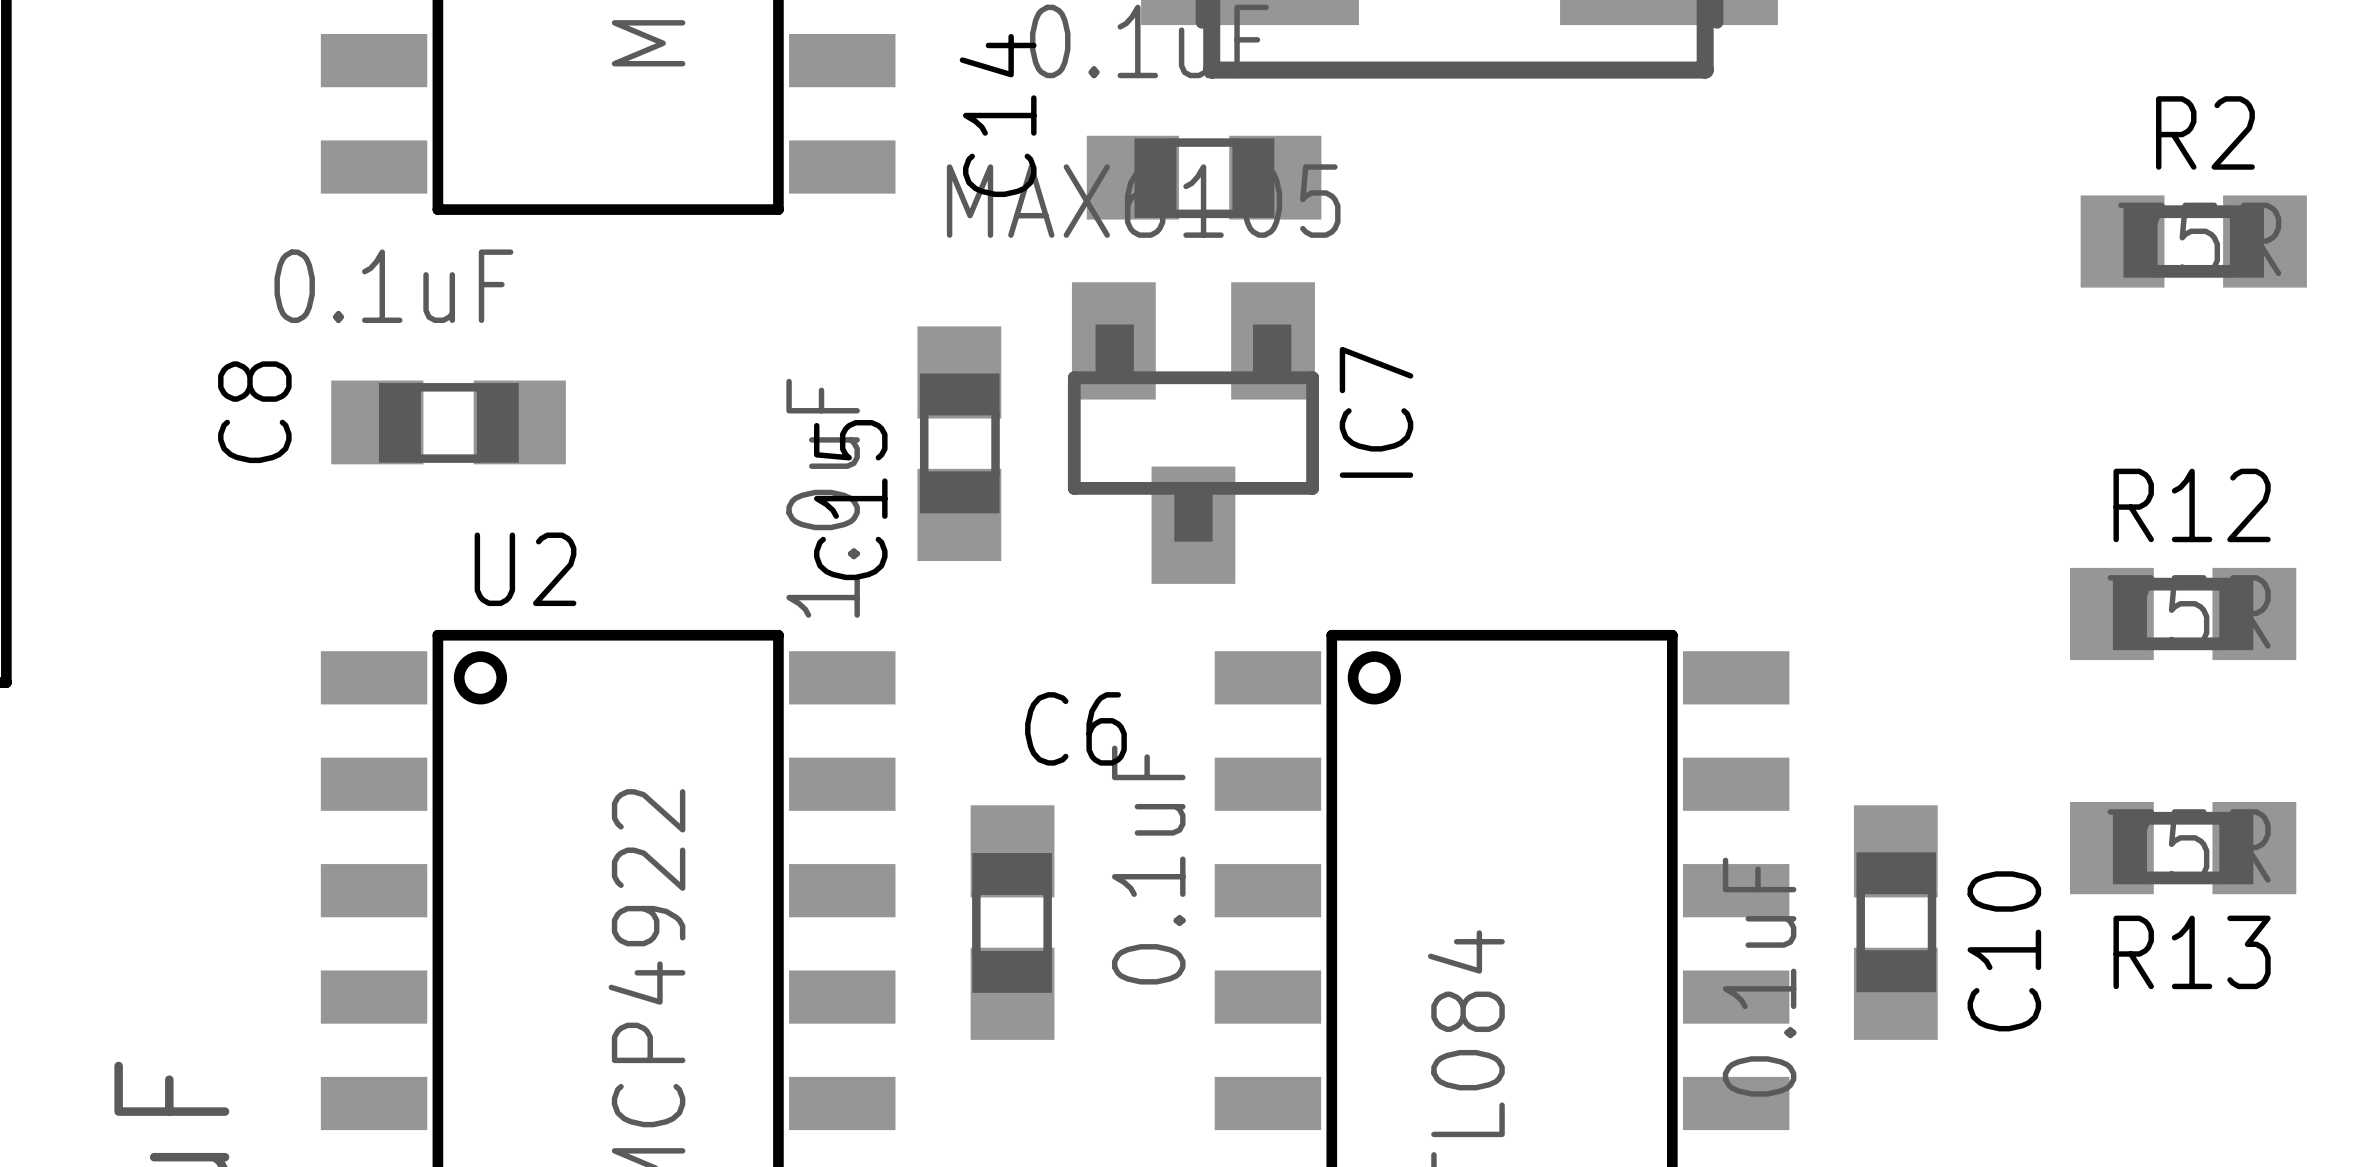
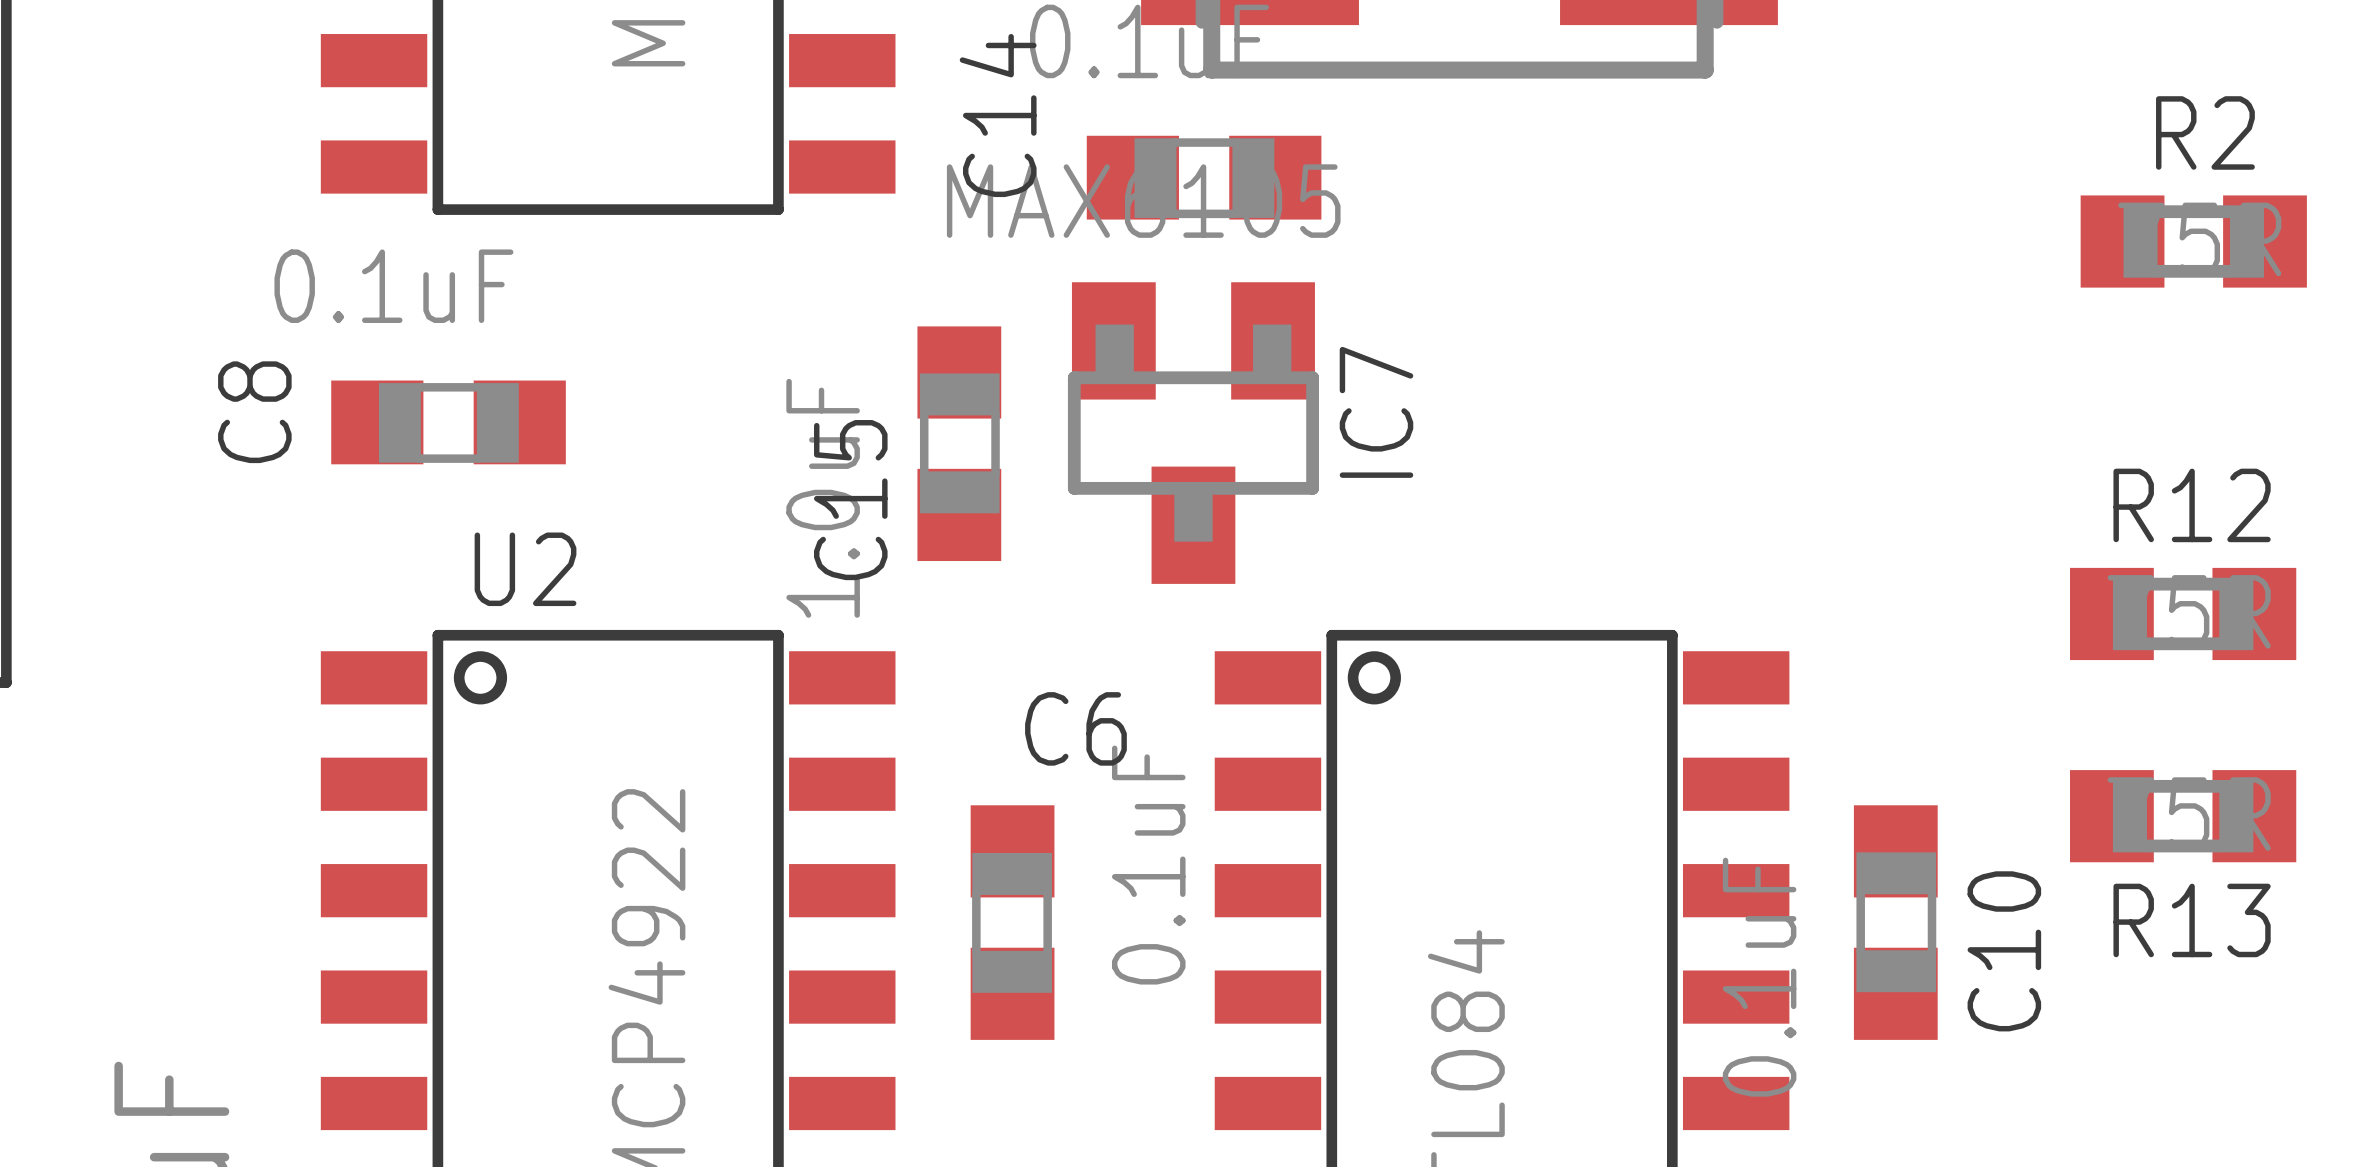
R13 position: (2183, 848) -> (2183, 816)

